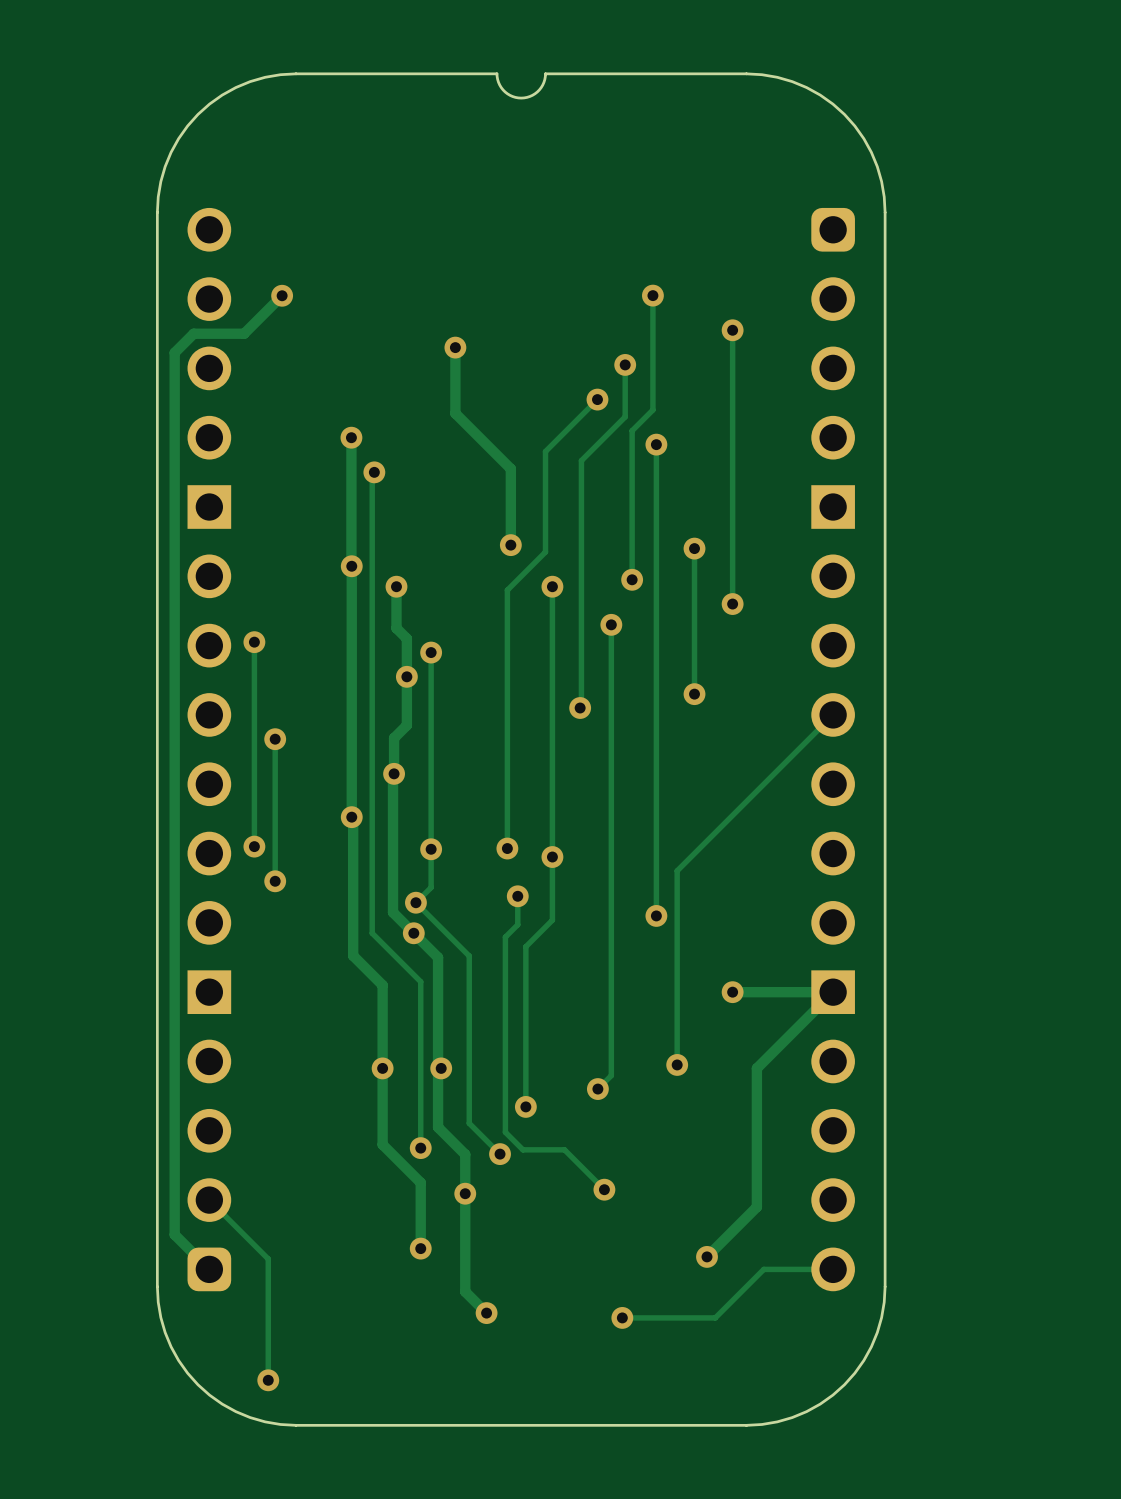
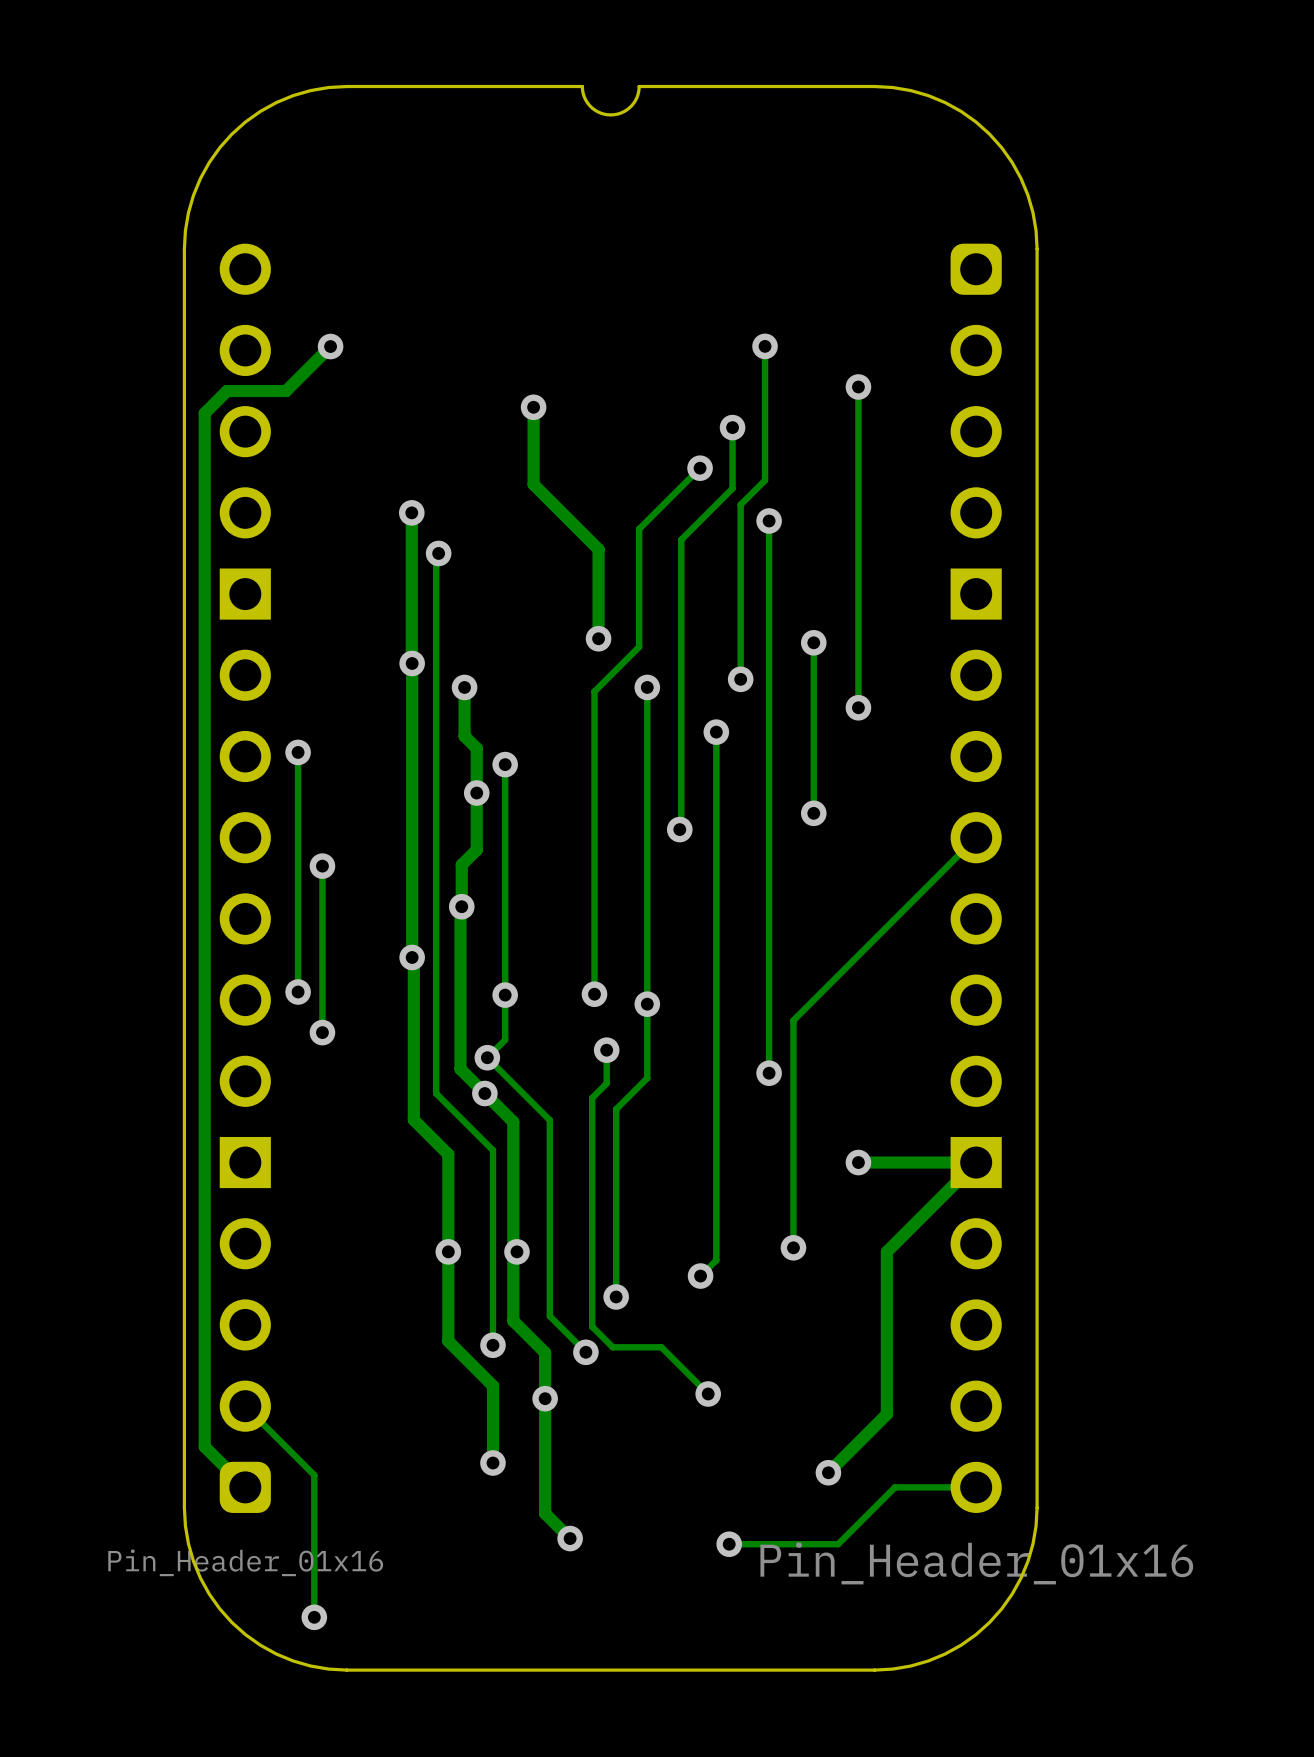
drawing: none -> [760, 1542, 1194, 1585]
drawing: none -> [108, 1549, 384, 1577]

